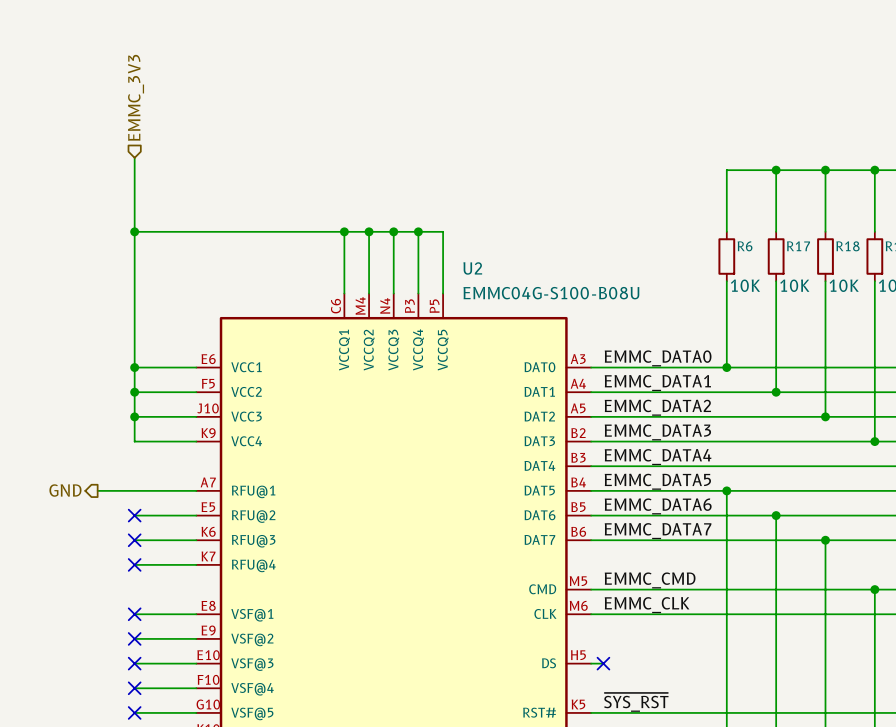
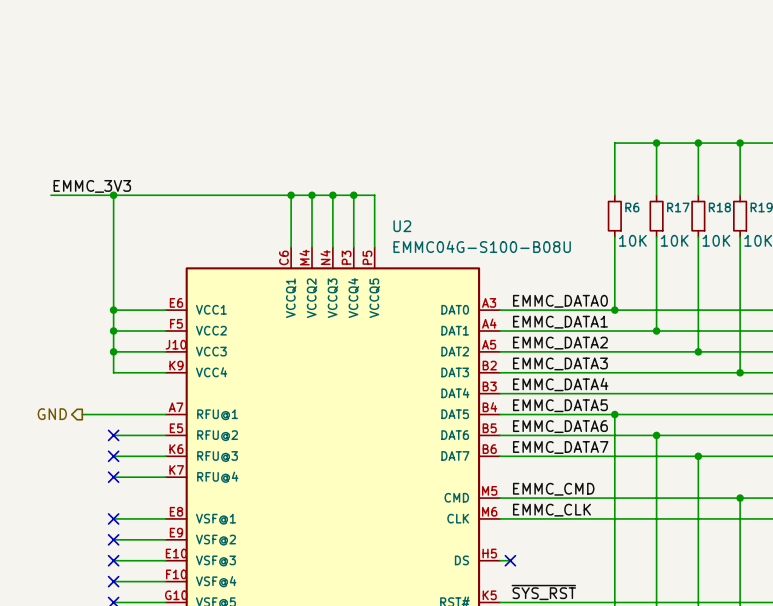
hierarchical label: EMMC_3V3 (136, 97) -> none
wire: (134, 157) (134, 231) -> (50, 195) (113, 195)
label: none -> EMMC_3V3 (92, 186)

